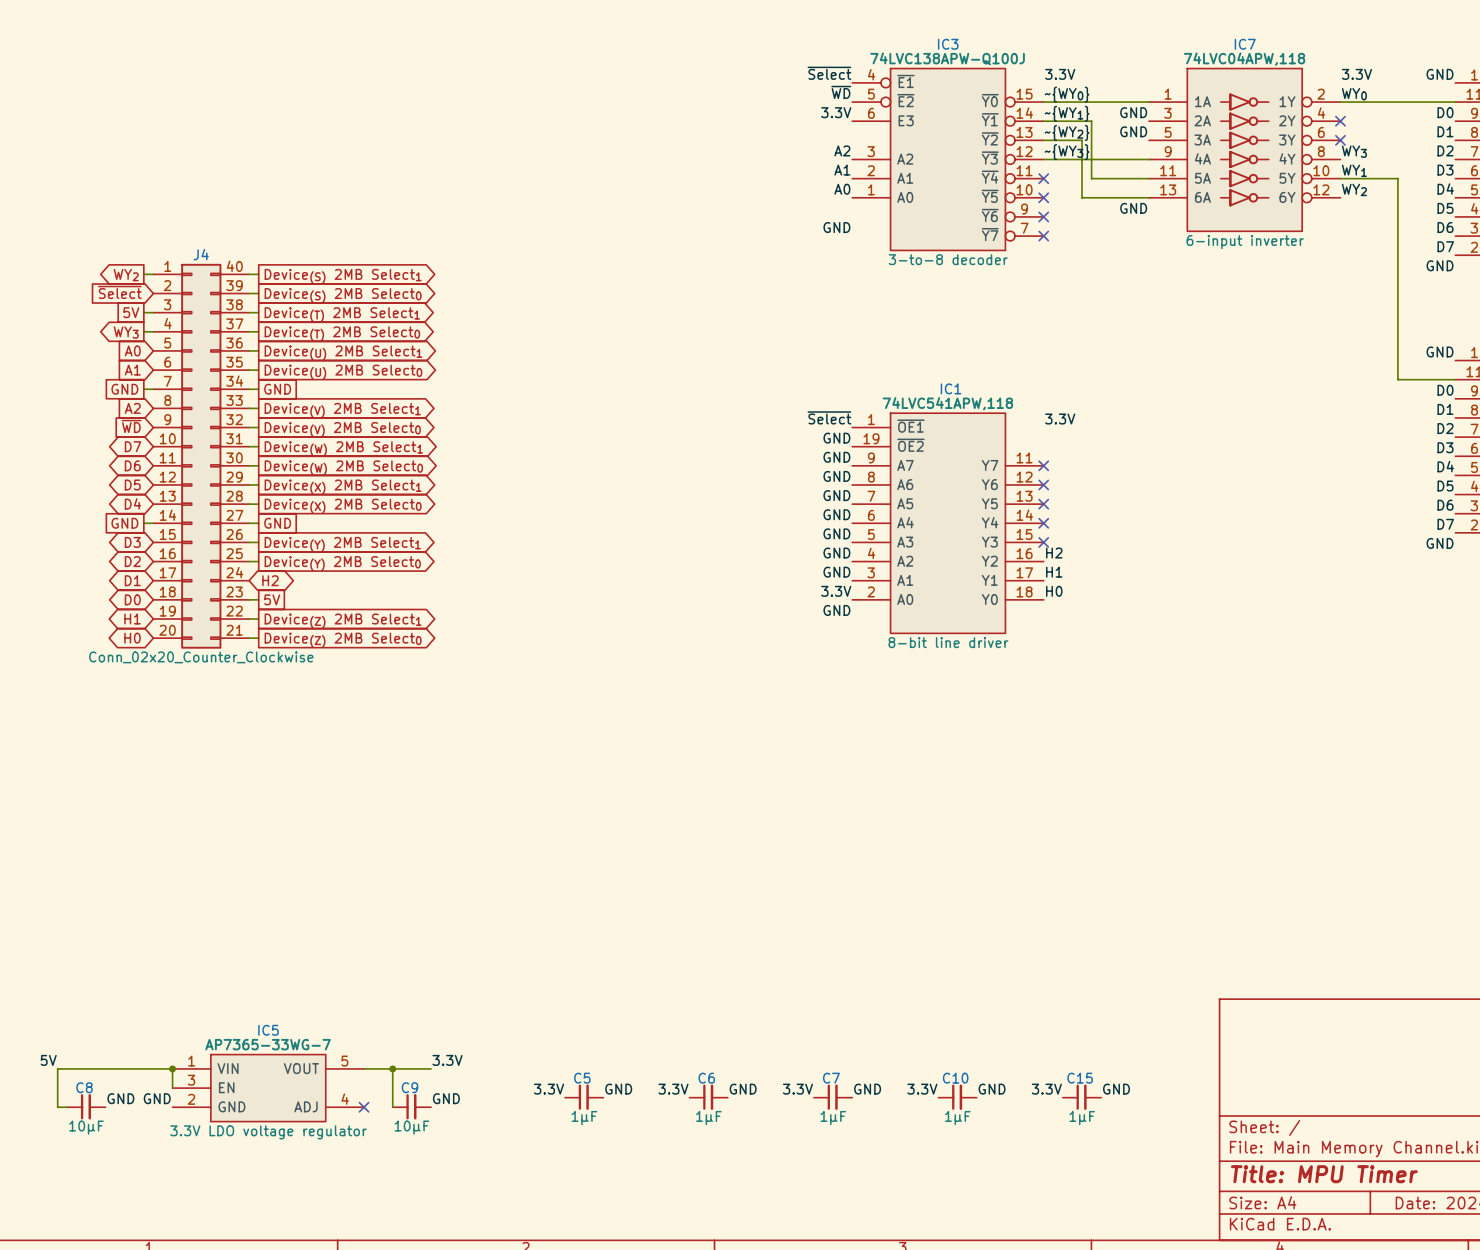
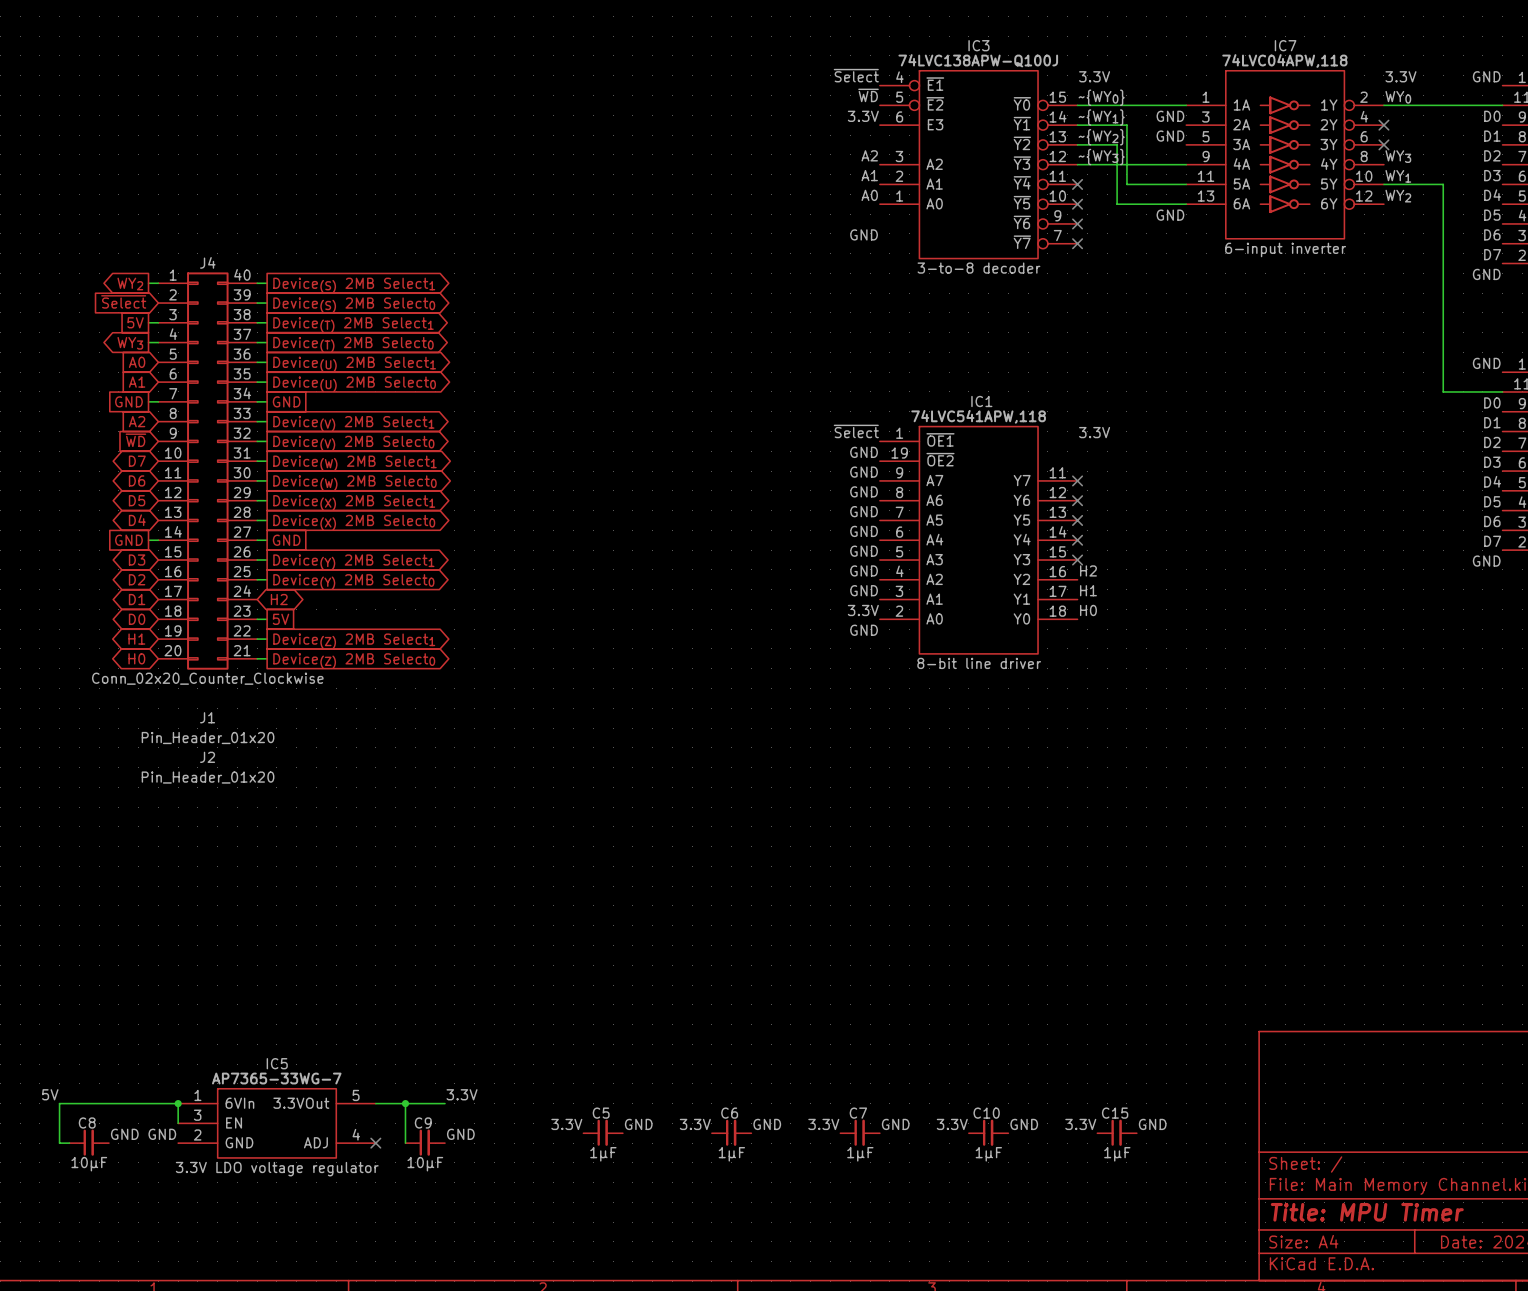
J1: none -> Pin_Header_01x20 (208, 728)
J2: none -> Pin_Header_01x20 (208, 767)
IC5 pin name: VIN (228, 1068) -> 6VIn (239, 1103)
IC5 pin name: VOUT (301, 1068) -> 3.3VOut (301, 1103)

